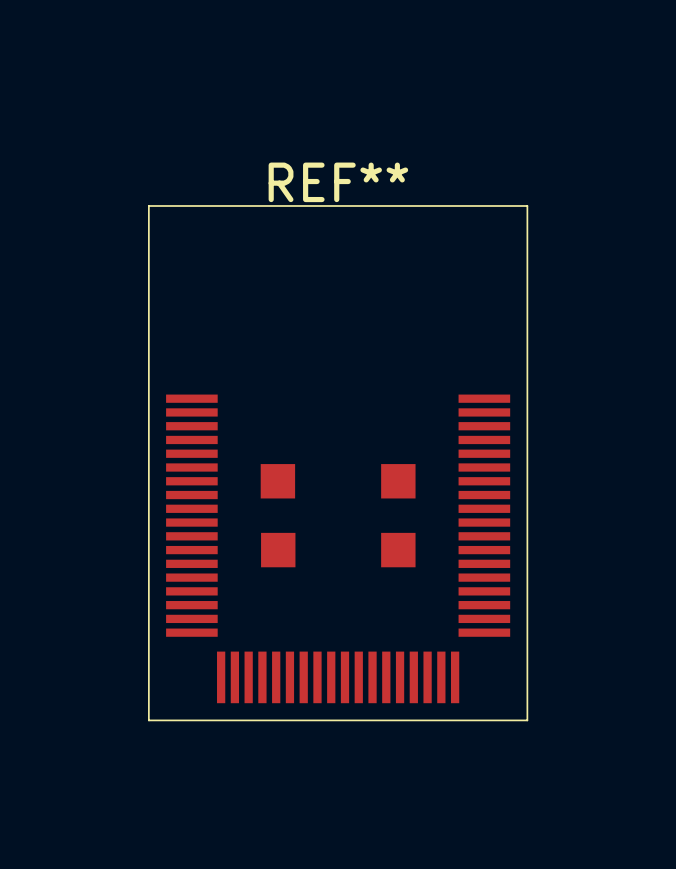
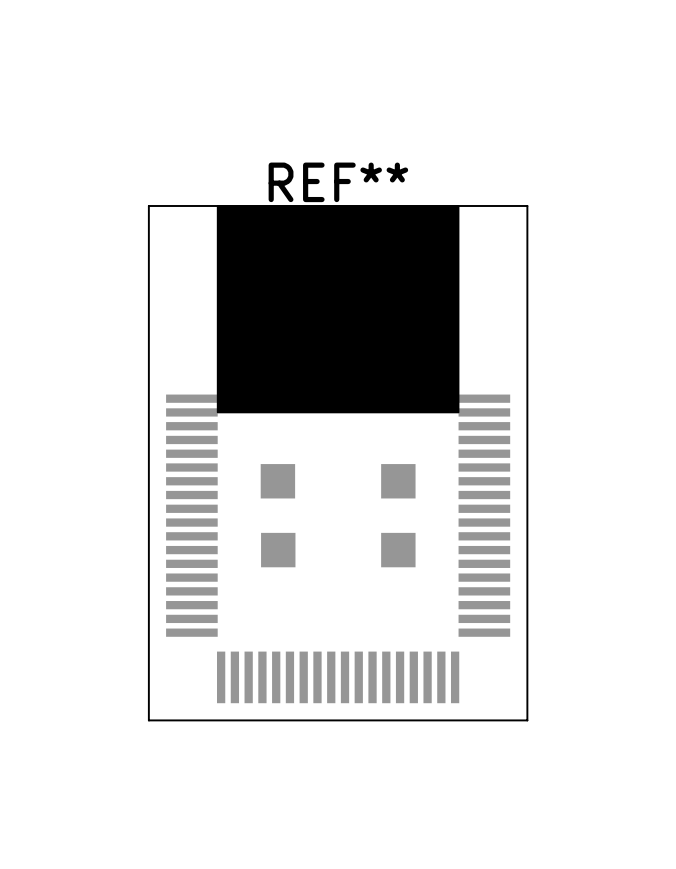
REF** footprint: [148, 205, 529, 722] -> [148, 205, 529, 722]

